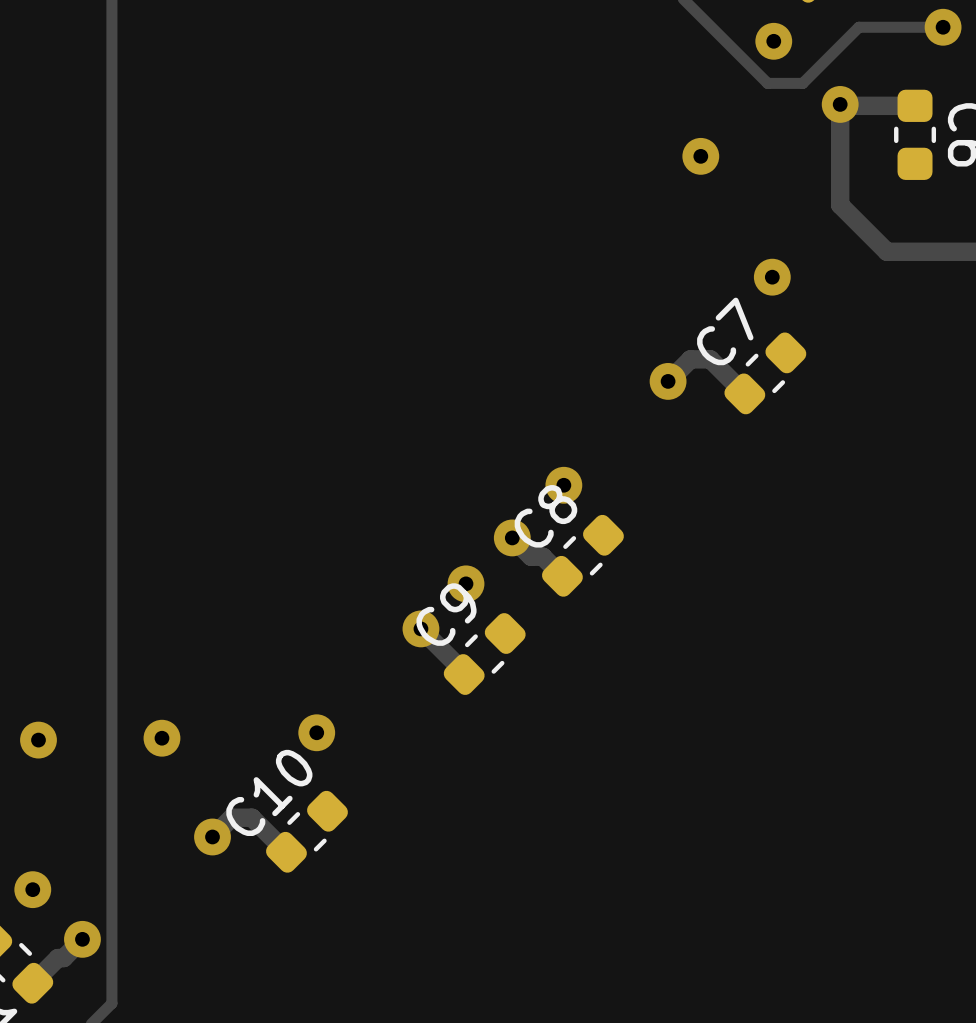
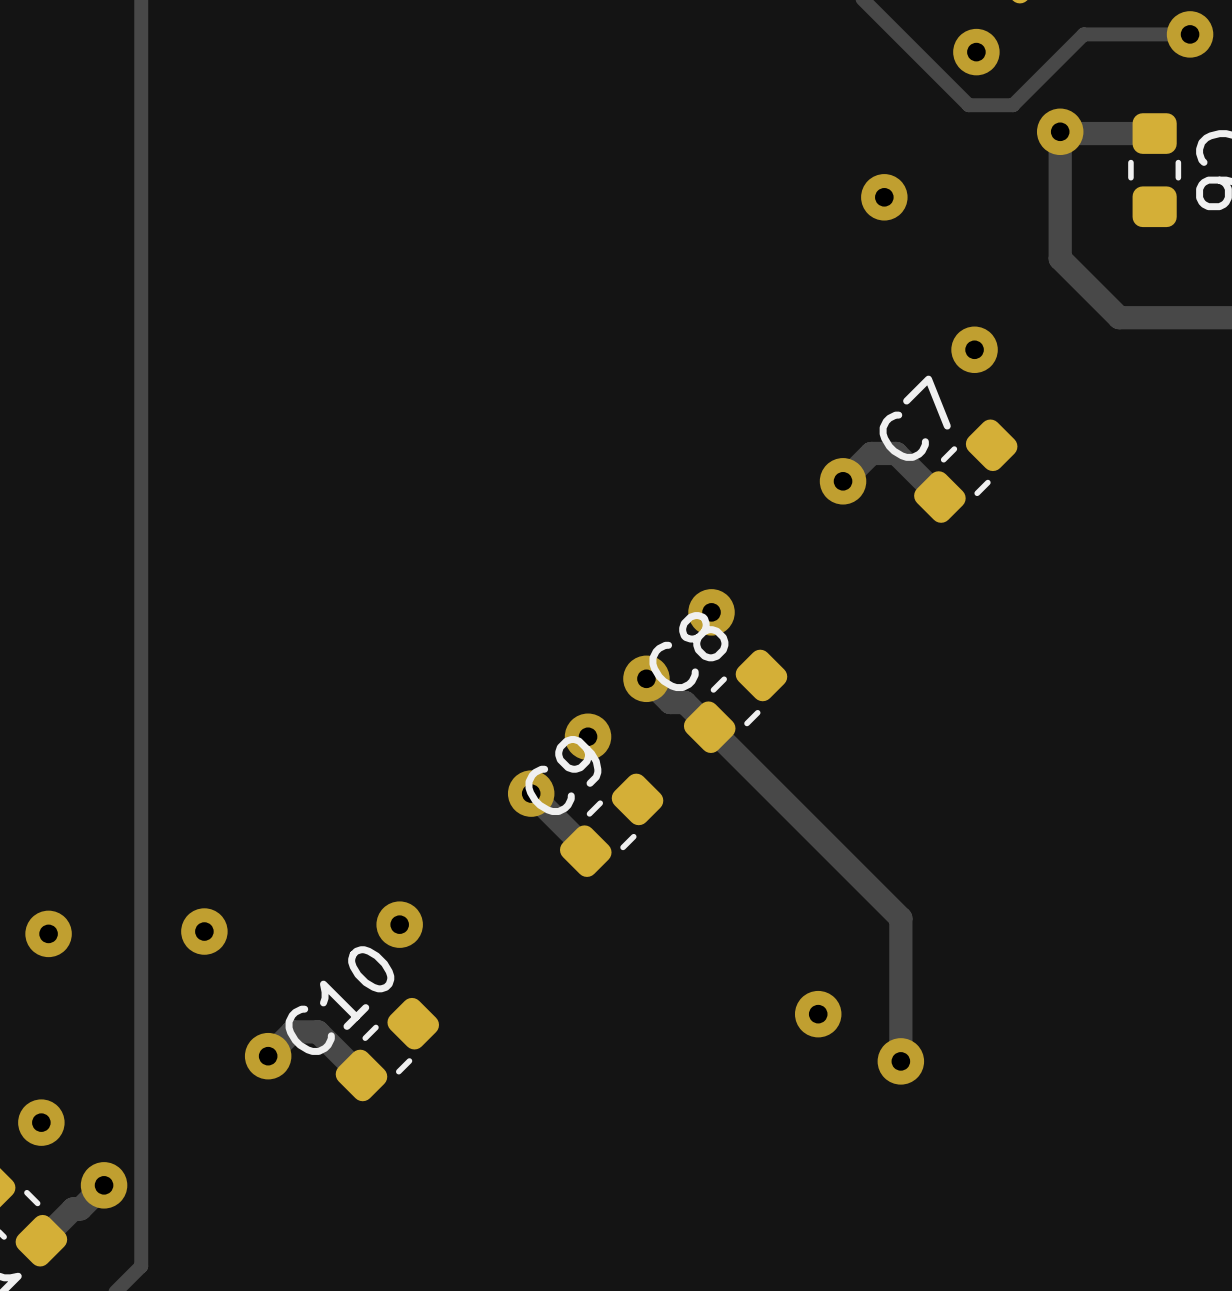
track: none -> (709, 727) (900, 918) (900, 1061)
via: none -> (818, 1014)
via: none -> (900, 1061)

